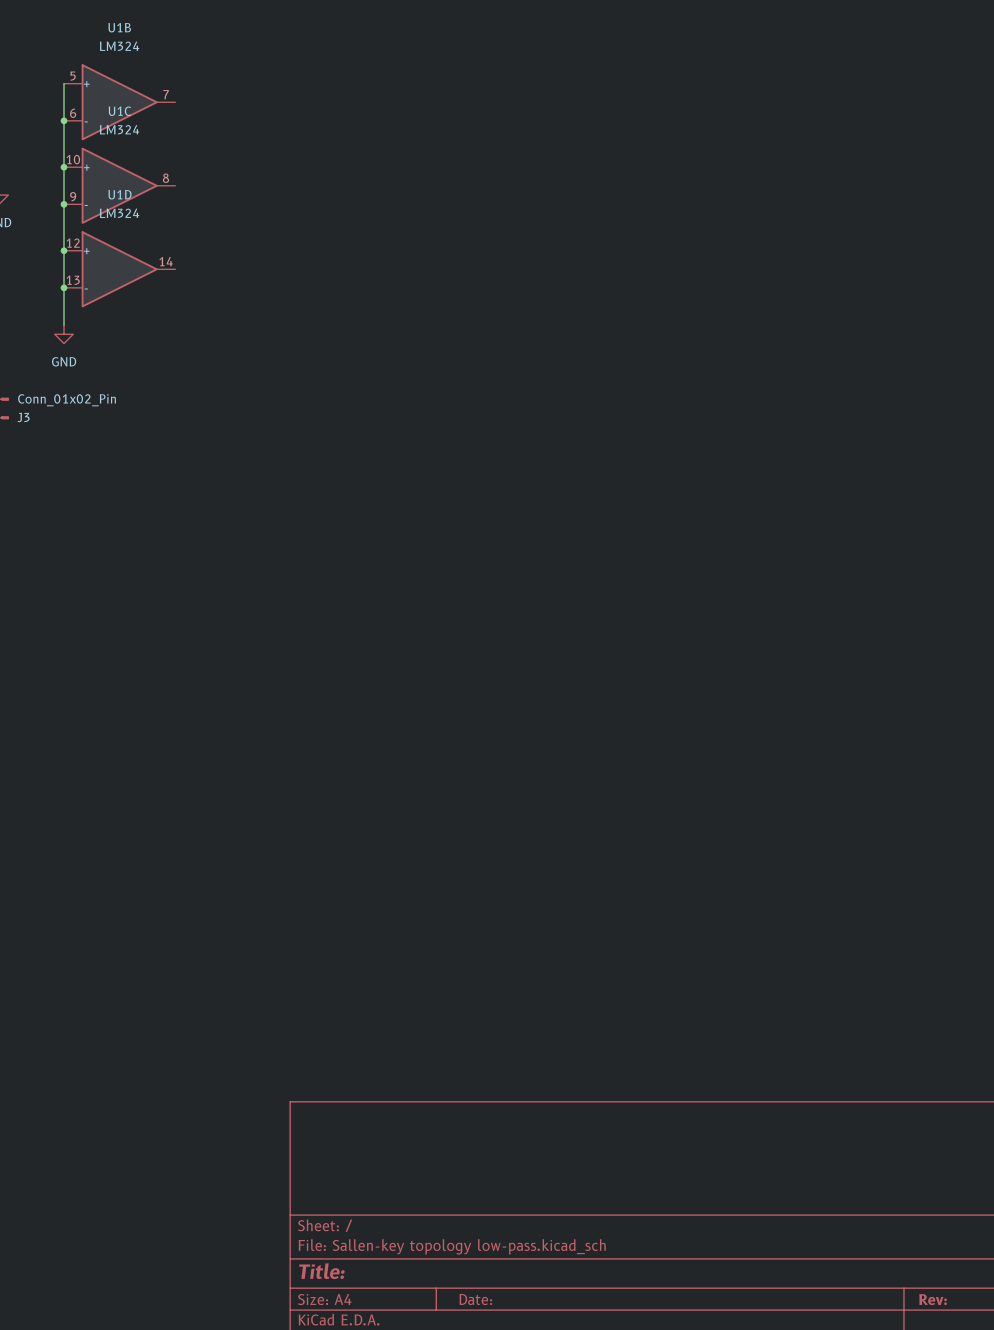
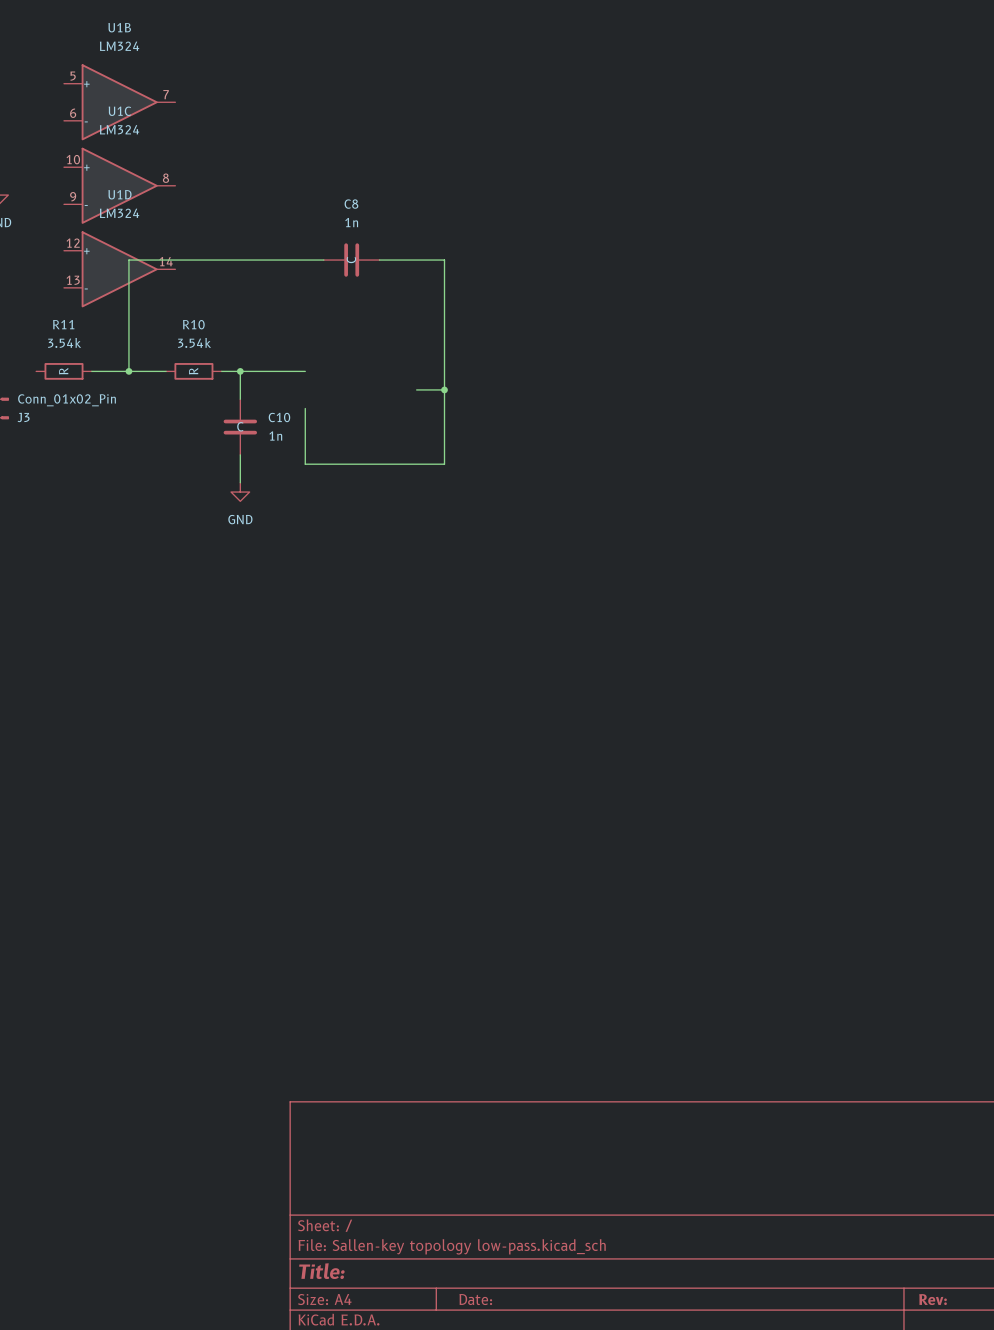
wire: (64, 83) (64, 324) -> none
junction: (64, 120) -> none
junction: (64, 167) -> none
junction: (64, 204) -> none
junction: (64, 250) -> none
wire: none -> (323, 260) (128, 260) (128, 371)
C8: none -> 1n (351, 260)
wire: none -> (379, 260) (444, 260) (444, 464) (305, 464) (305, 408)
junction: (64, 287) -> none
power symbol: GND (64, 334) -> none
R11: none -> 3.54k (64, 371)
wire: none -> (91, 371) (166, 371)
junction: none -> (128, 371)
R10: none -> 3.54k (193, 371)
wire: none -> (221, 371) (305, 371)
wire: none -> (240, 371) (240, 399)
junction: none -> (240, 371)
wire: none -> (416, 389) (444, 389)
junction: none -> (444, 389)
C10: none -> 1n (240, 427)
wire: none -> (240, 454) (240, 482)
power symbol: none -> GND (240, 492)

